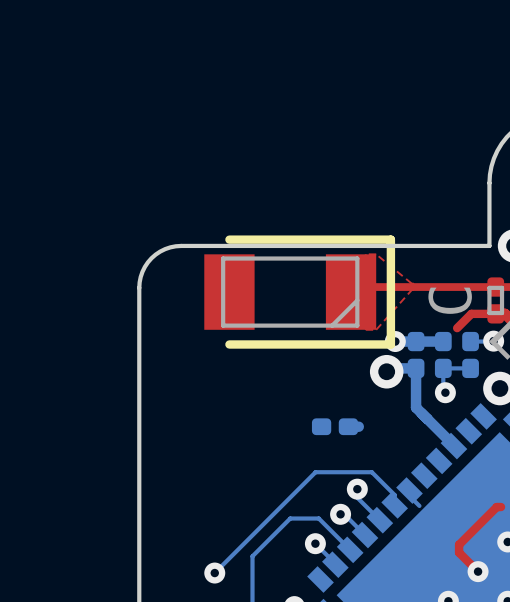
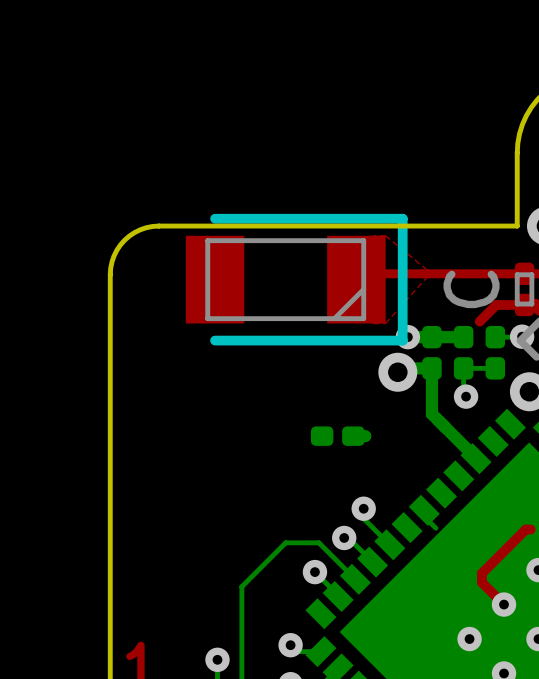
bottom track: (394, 505) (394, 495) (371, 472) (315, 472) (214, 573) -> none
via: (214, 573) -> none

